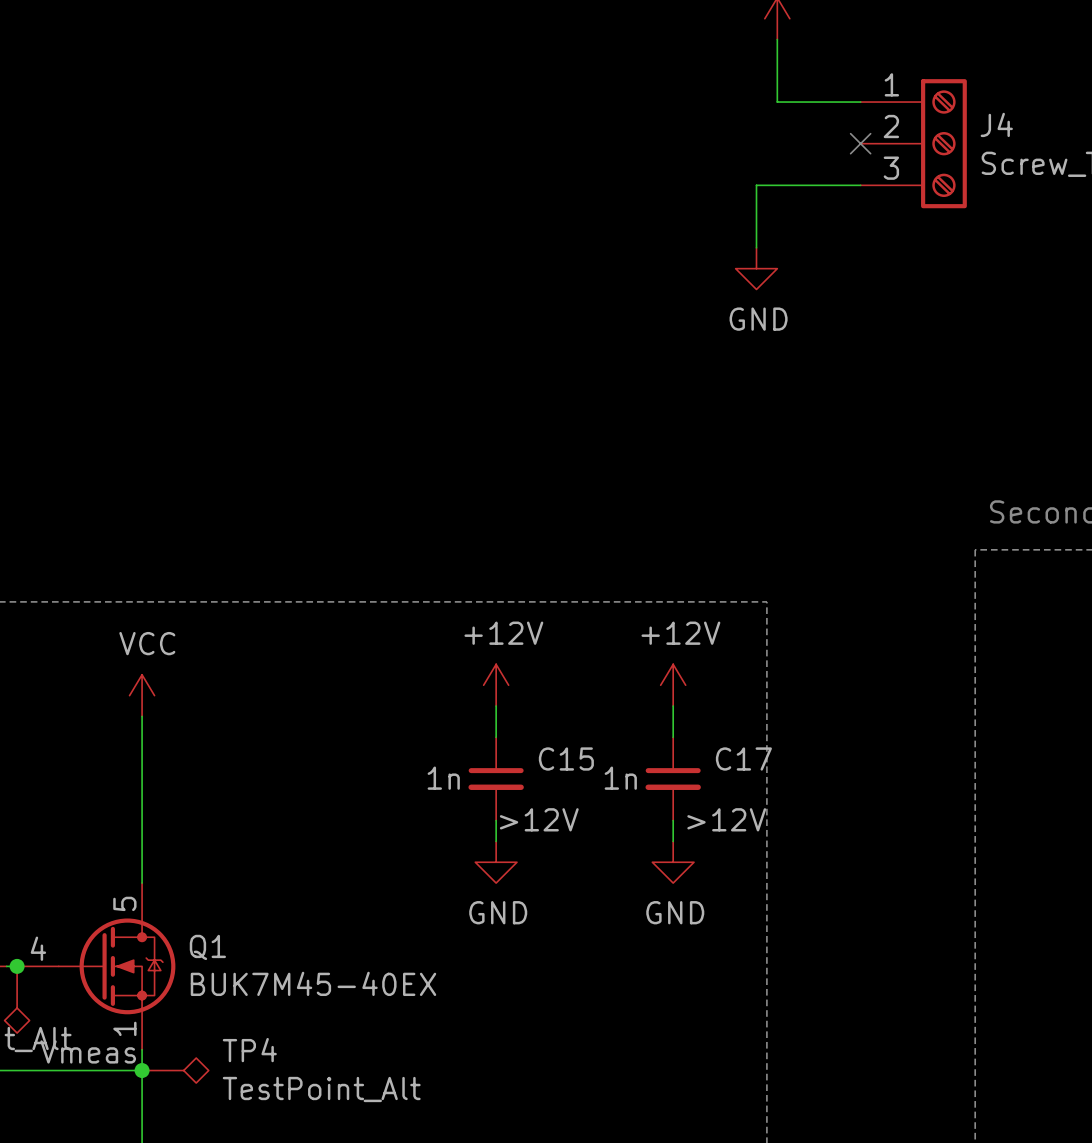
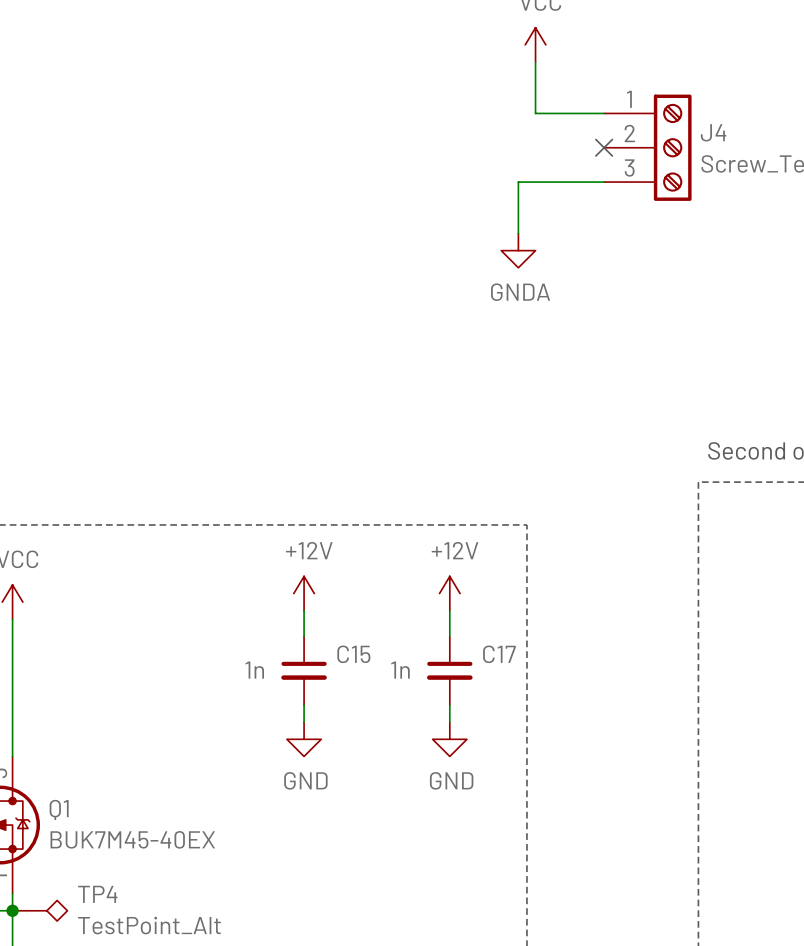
power symbol: GND (756, 268) -> GNDA (518, 250)
C15 text: >12V (539, 819) -> none
C17 text: >12V (726, 819) -> none

